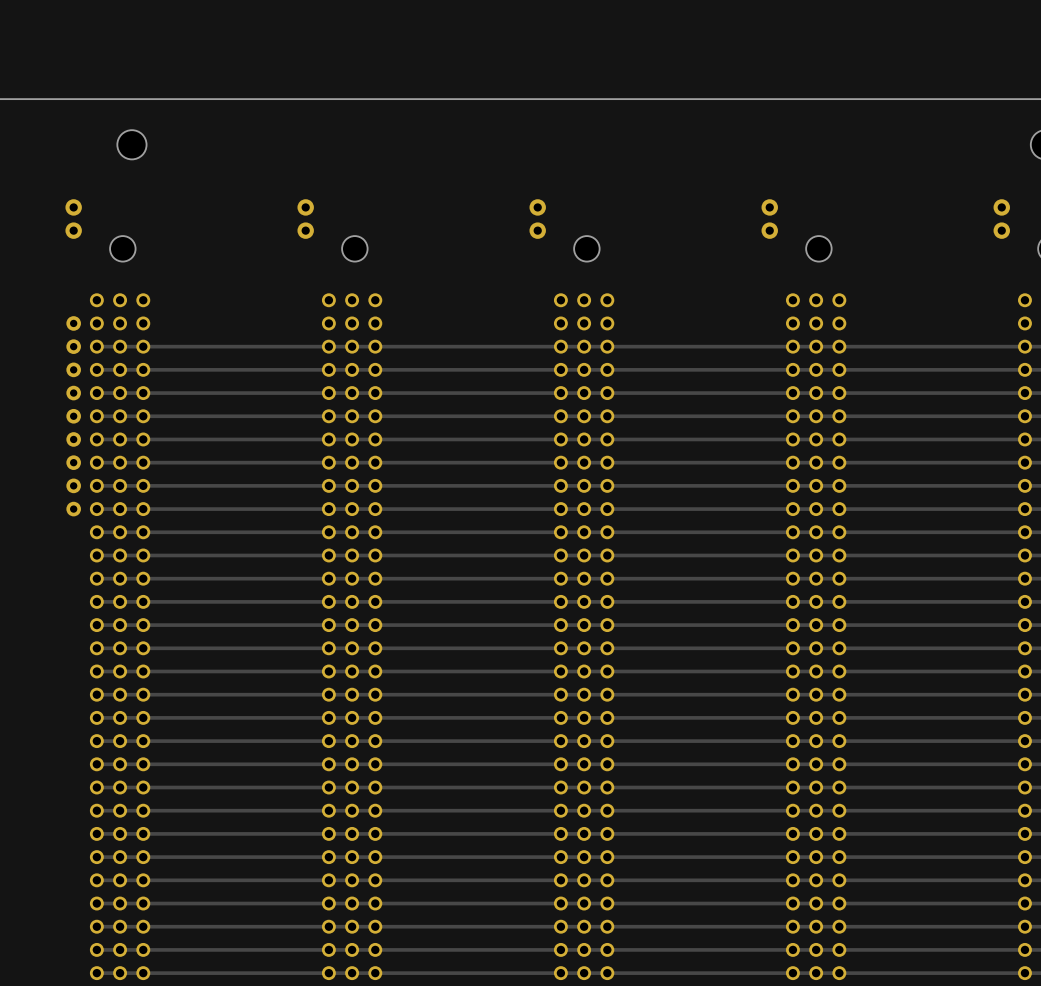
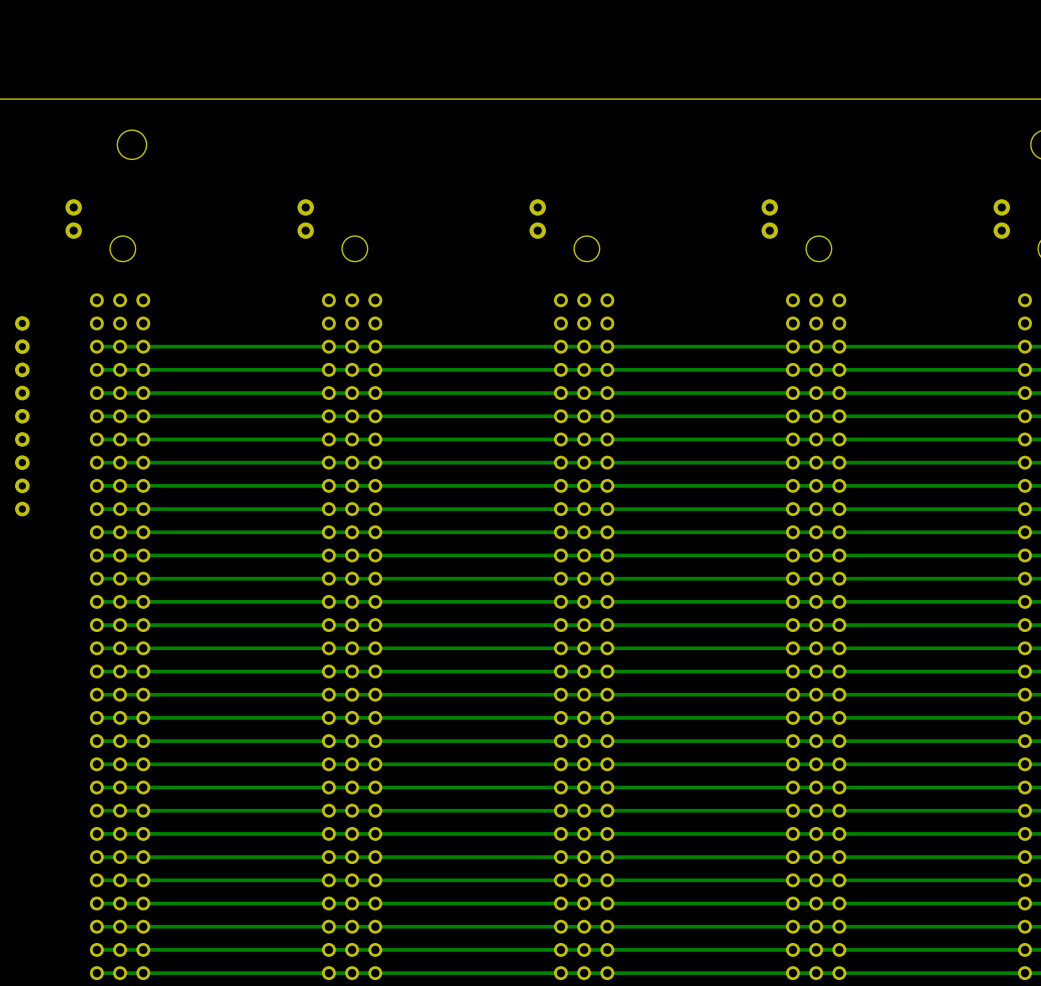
part position: (73, 416) -> (22, 416)

